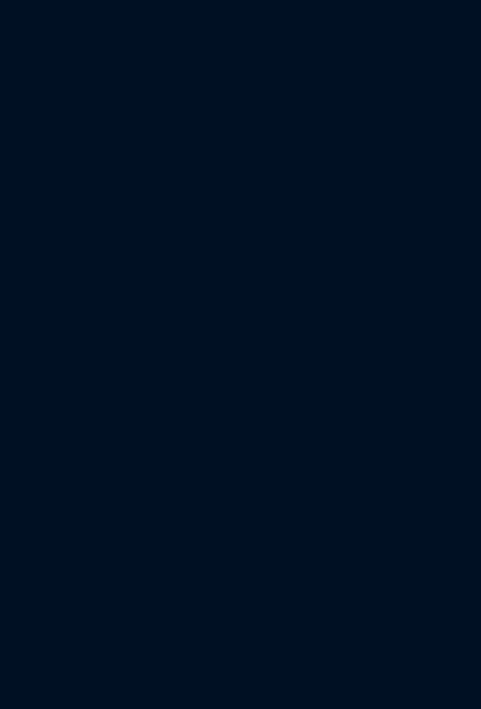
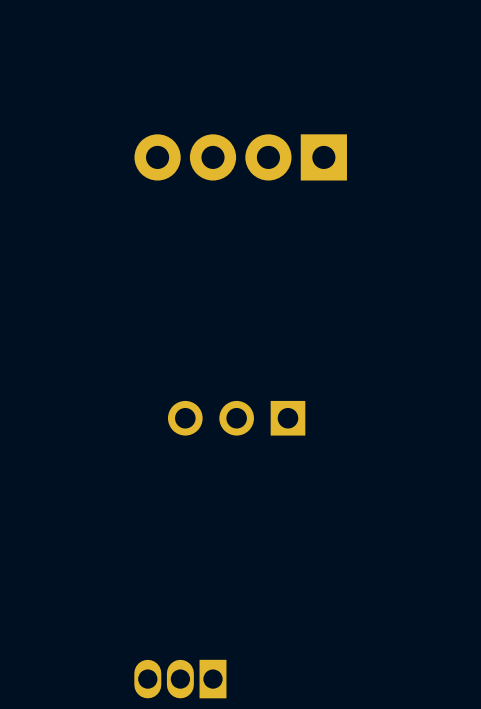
part: none -> (240, 157)
part: none -> (236, 418)
part: none -> (180, 679)

